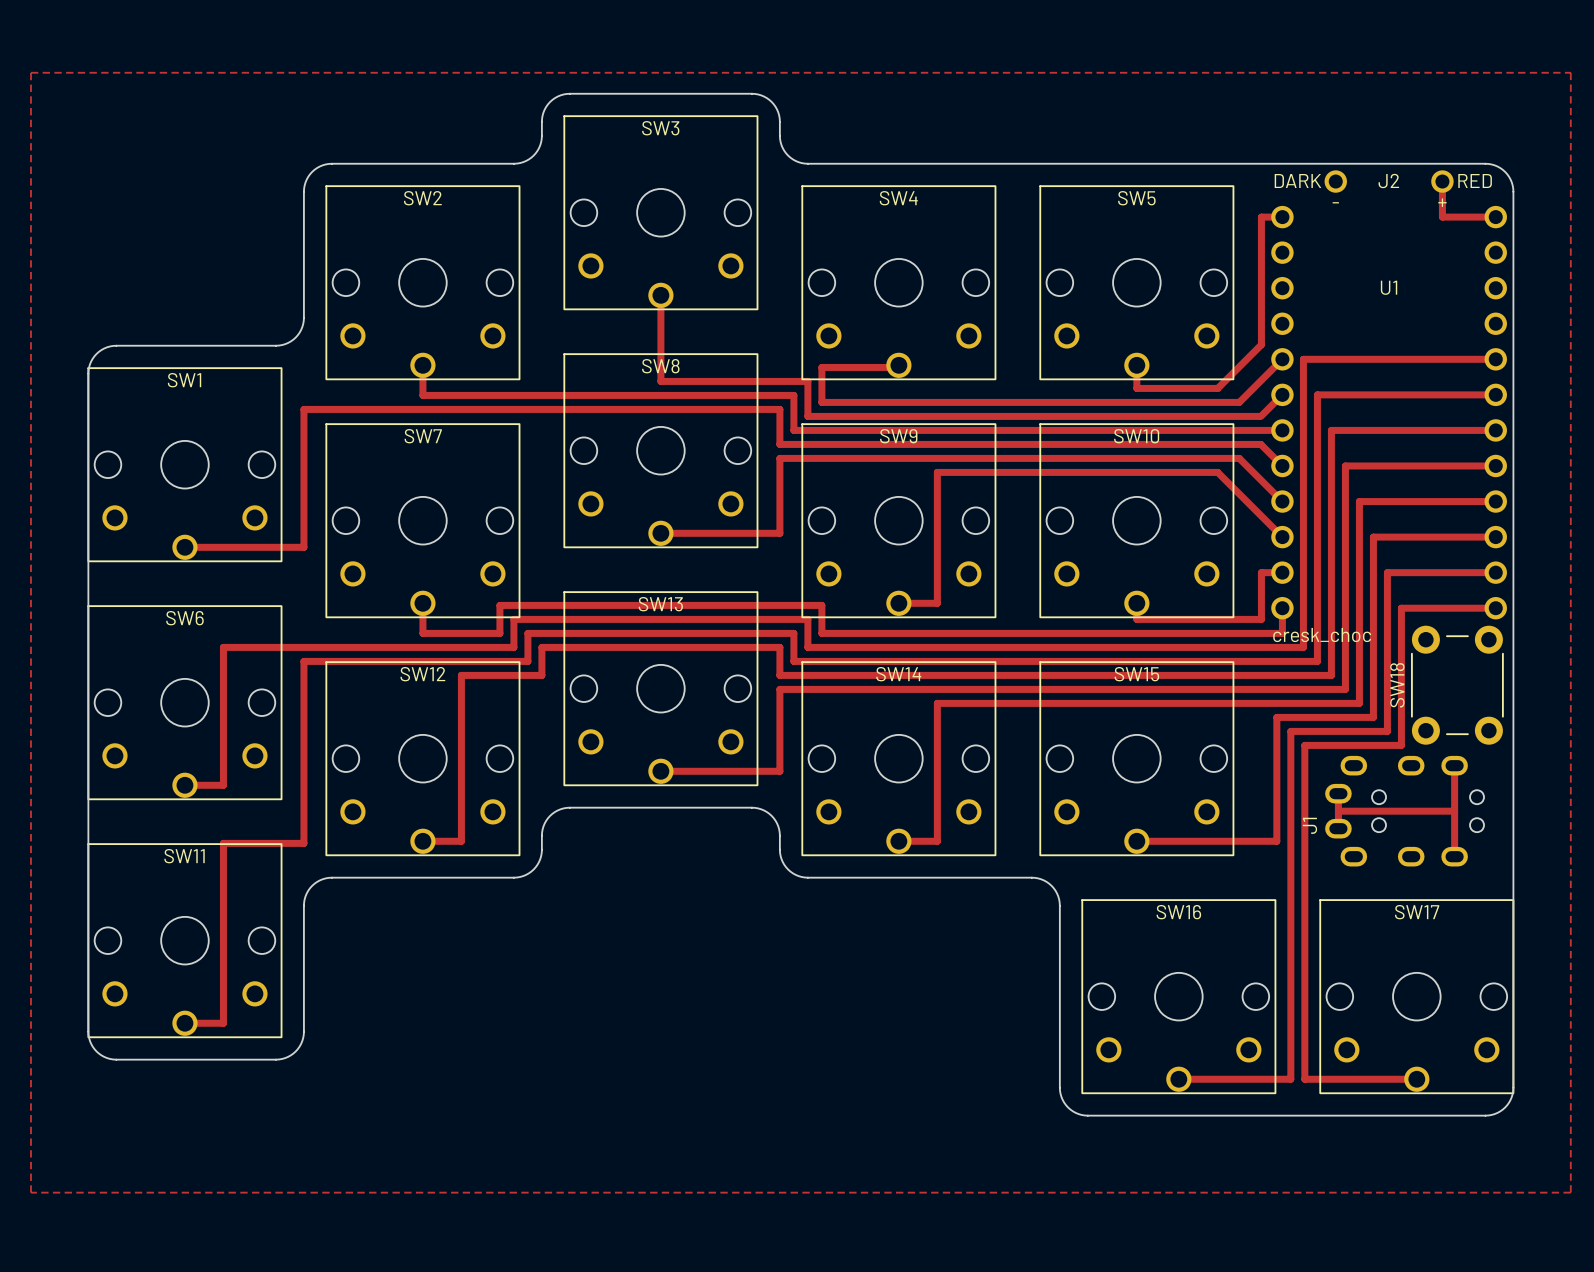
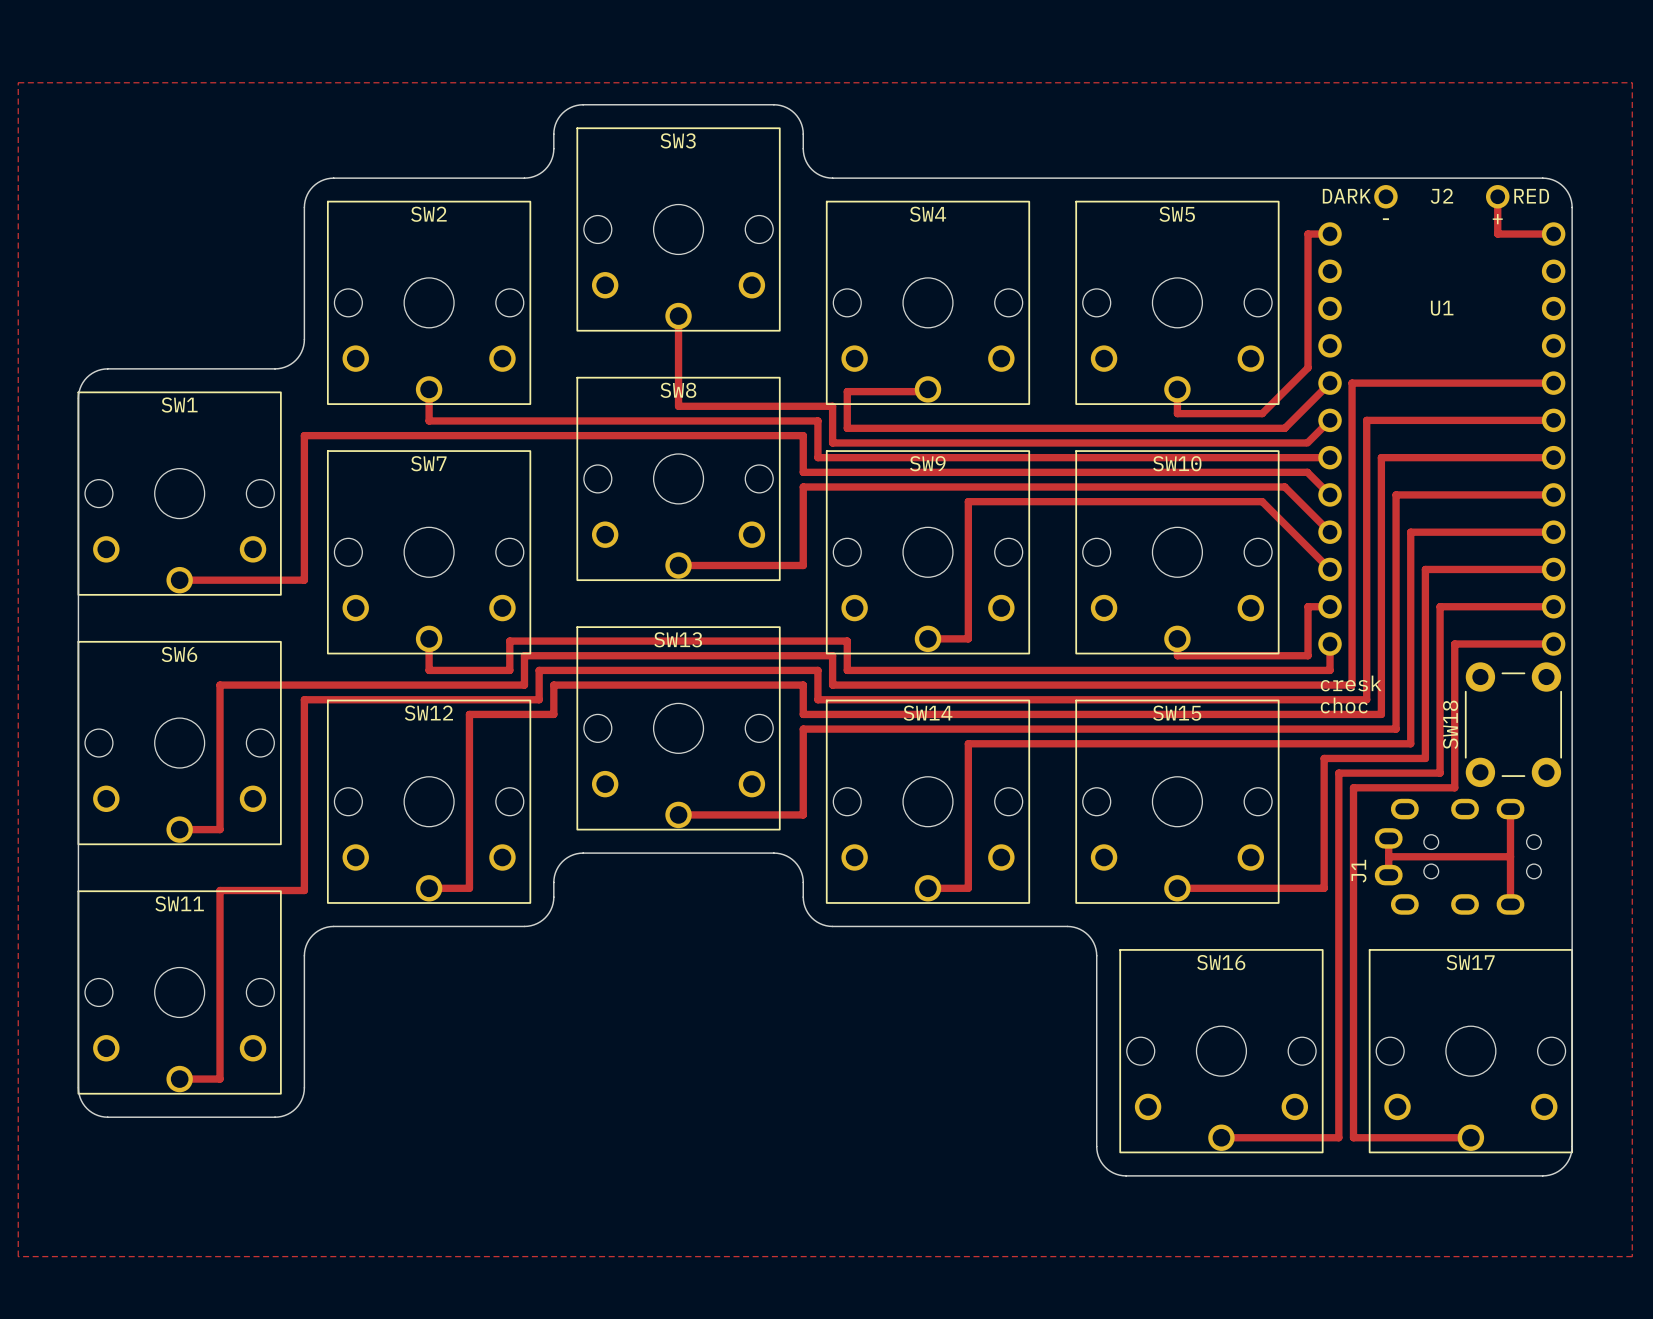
text: cresk_choc (1322, 635) -> cresk (1351, 683)
text: none -> choc (1344, 705)

